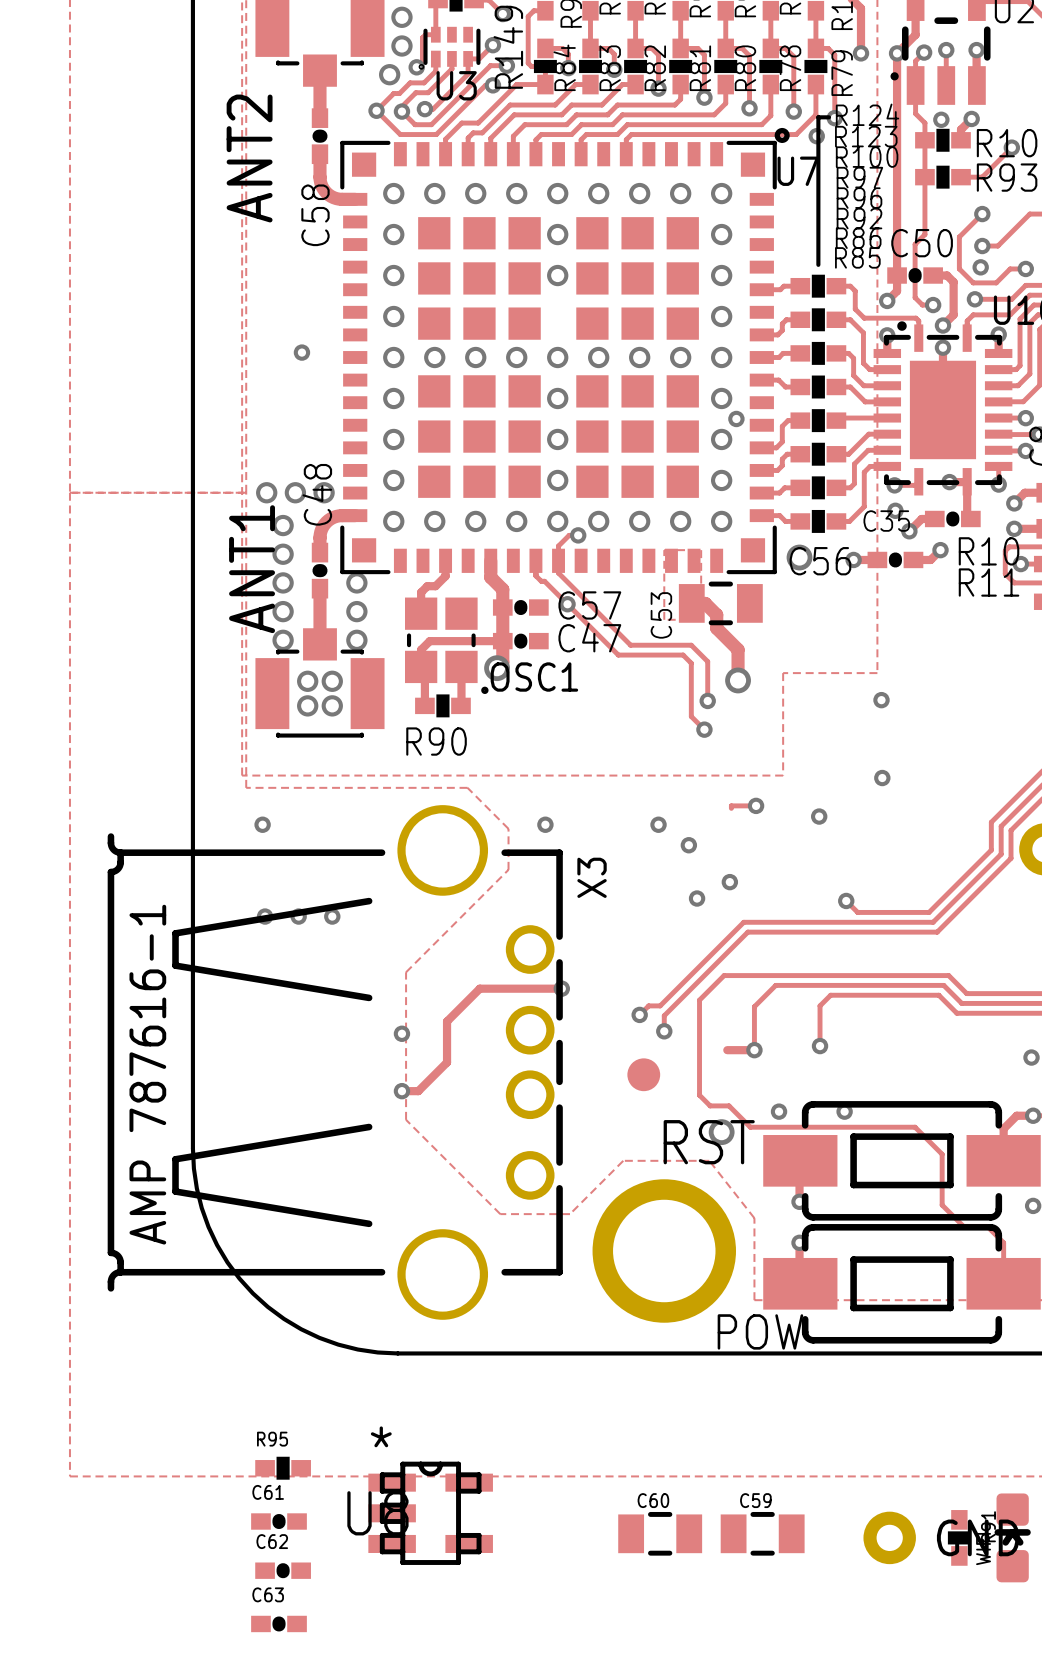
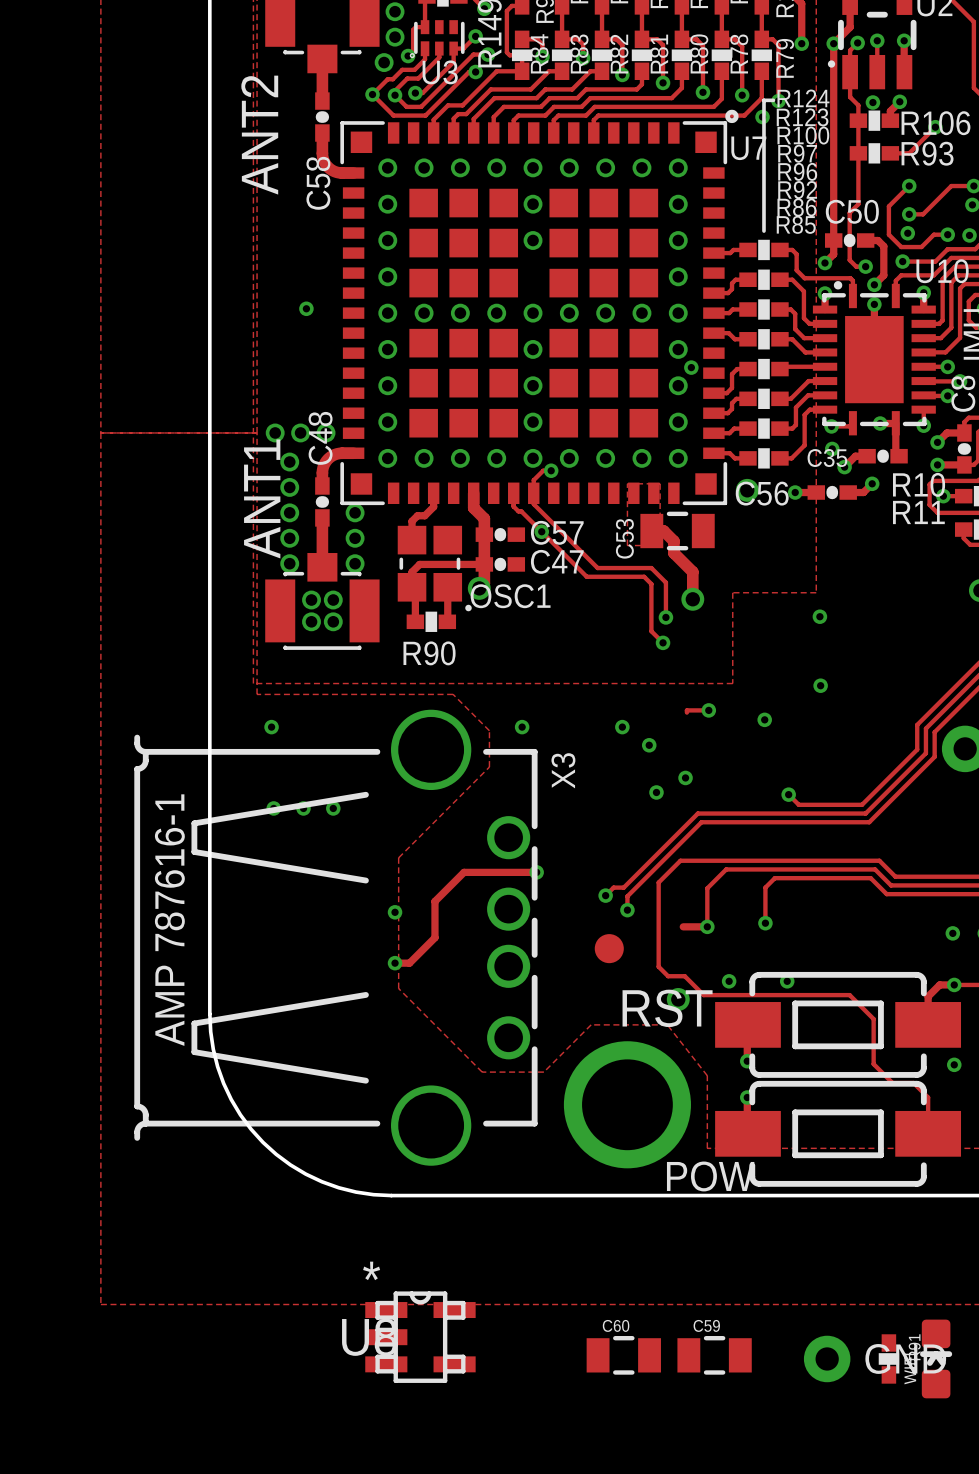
R95: (283, 1468) -> none
C61: (279, 1521) -> none
C62: (283, 1570) -> none
C63: (279, 1623) -> none

